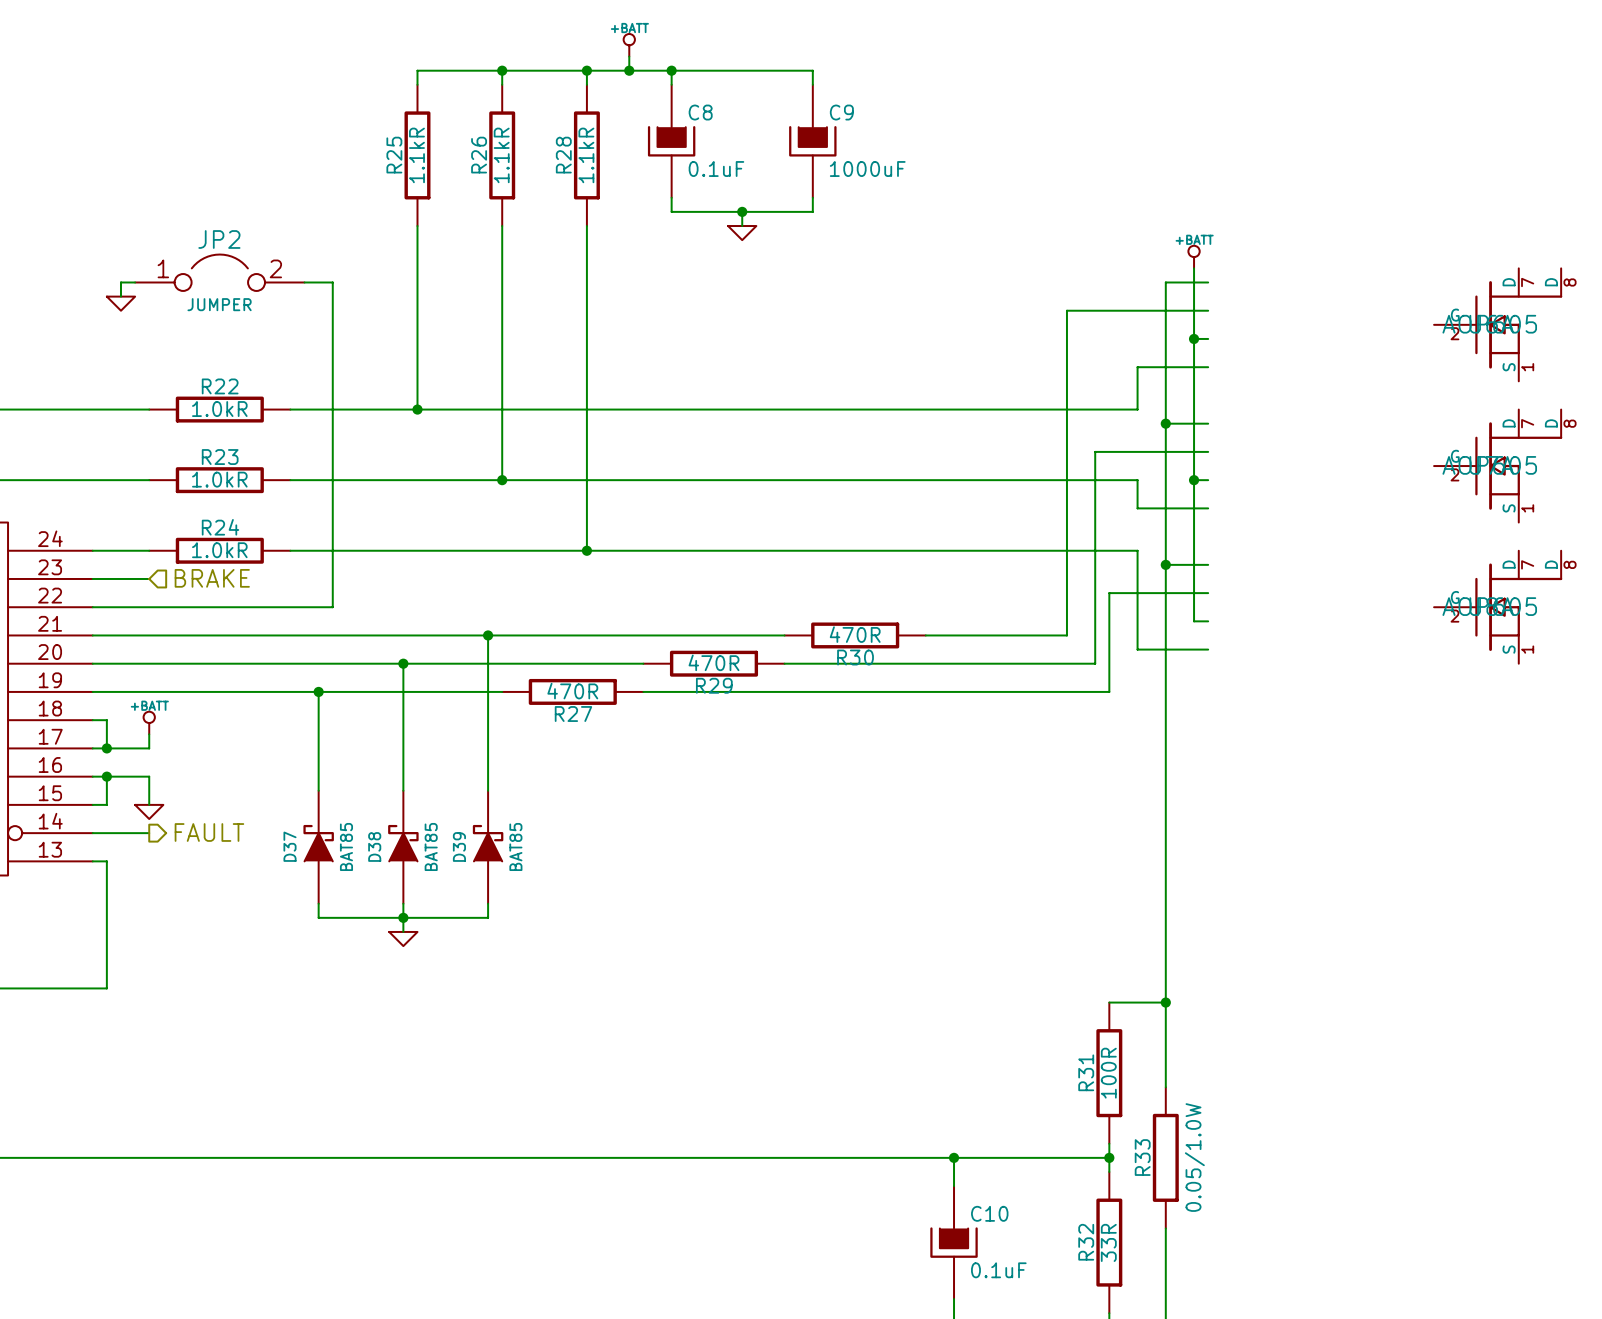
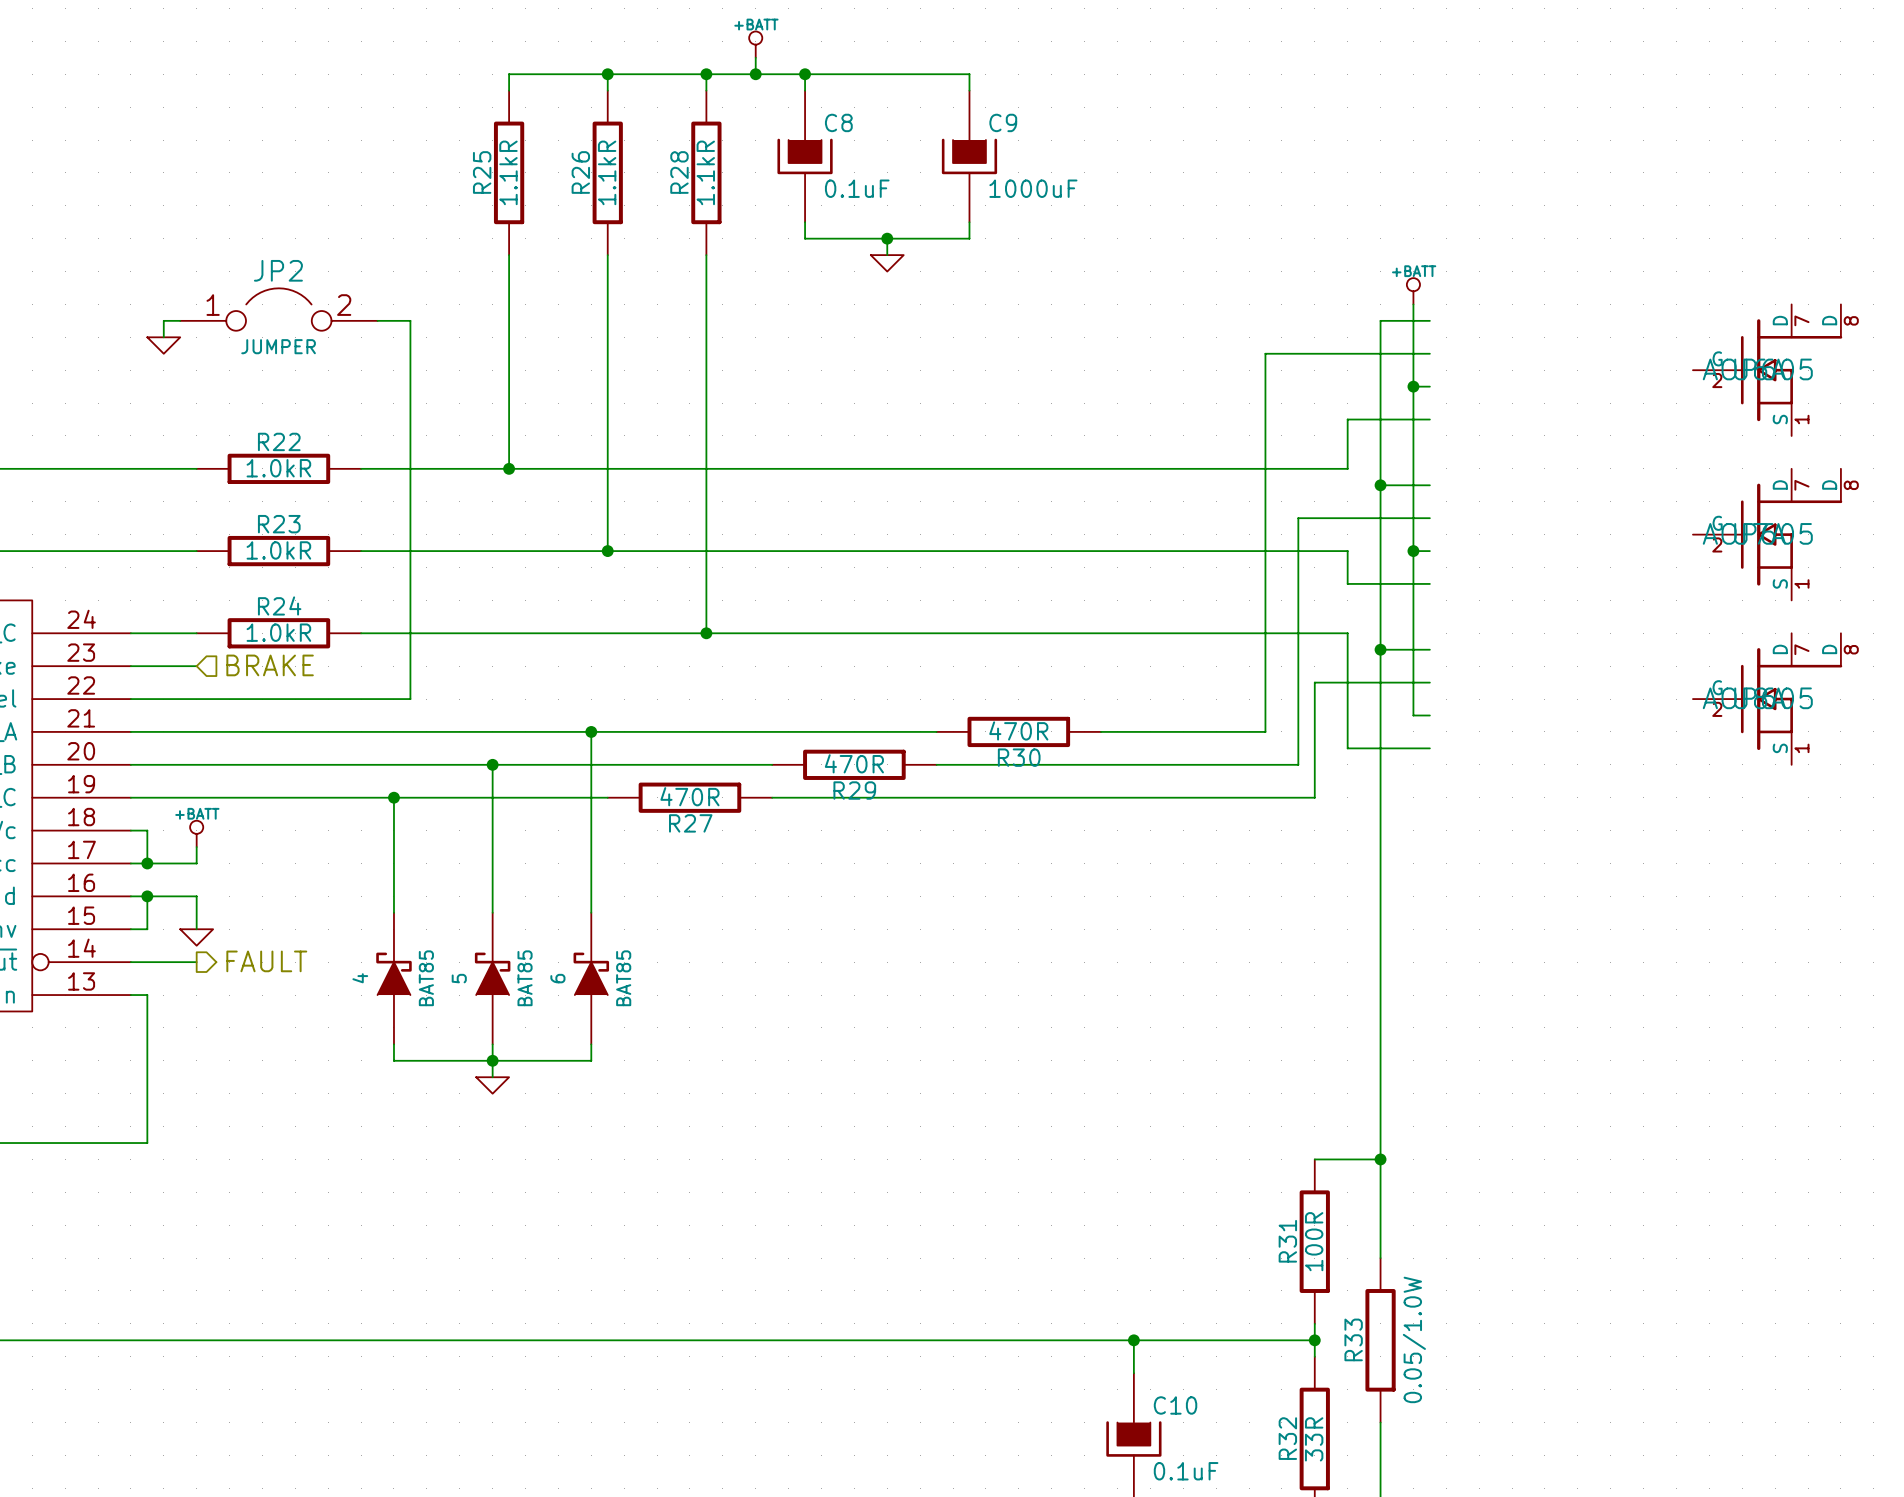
D37 name: D37 (290, 846) -> 4 (360, 978)
D38 name: D38 (374, 846) -> 5 (459, 978)
D39 name: D39 (459, 846) -> 6 (557, 978)

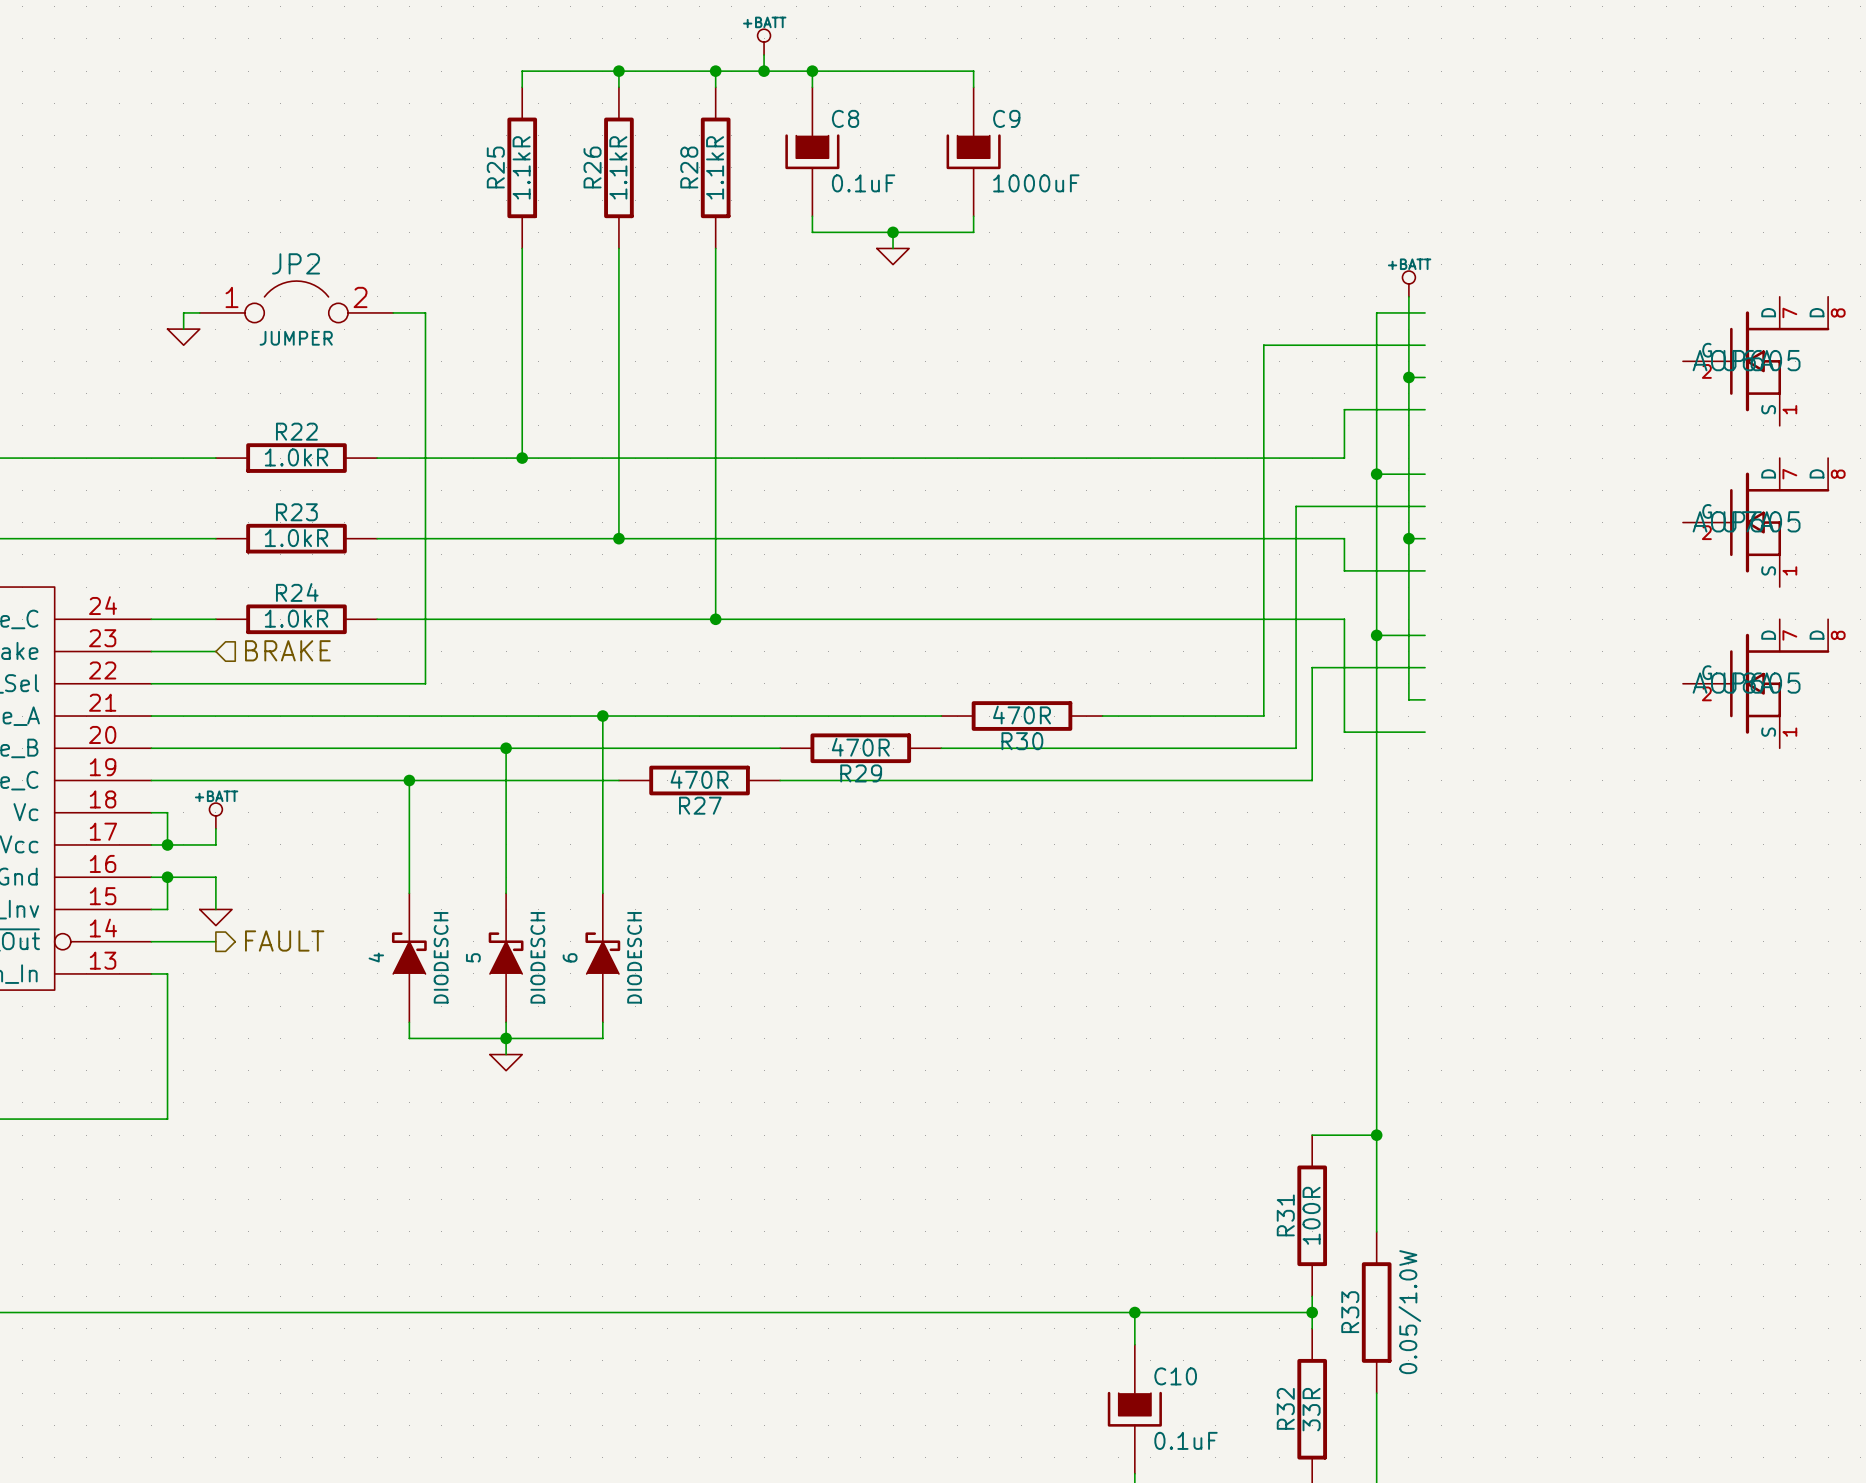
4 value: BAT85 (426, 978) -> DIODESCH (441, 957)
5 value: BAT85 (525, 978) -> DIODESCH (537, 957)
6 value: BAT85 (623, 978) -> DIODESCH (634, 957)

